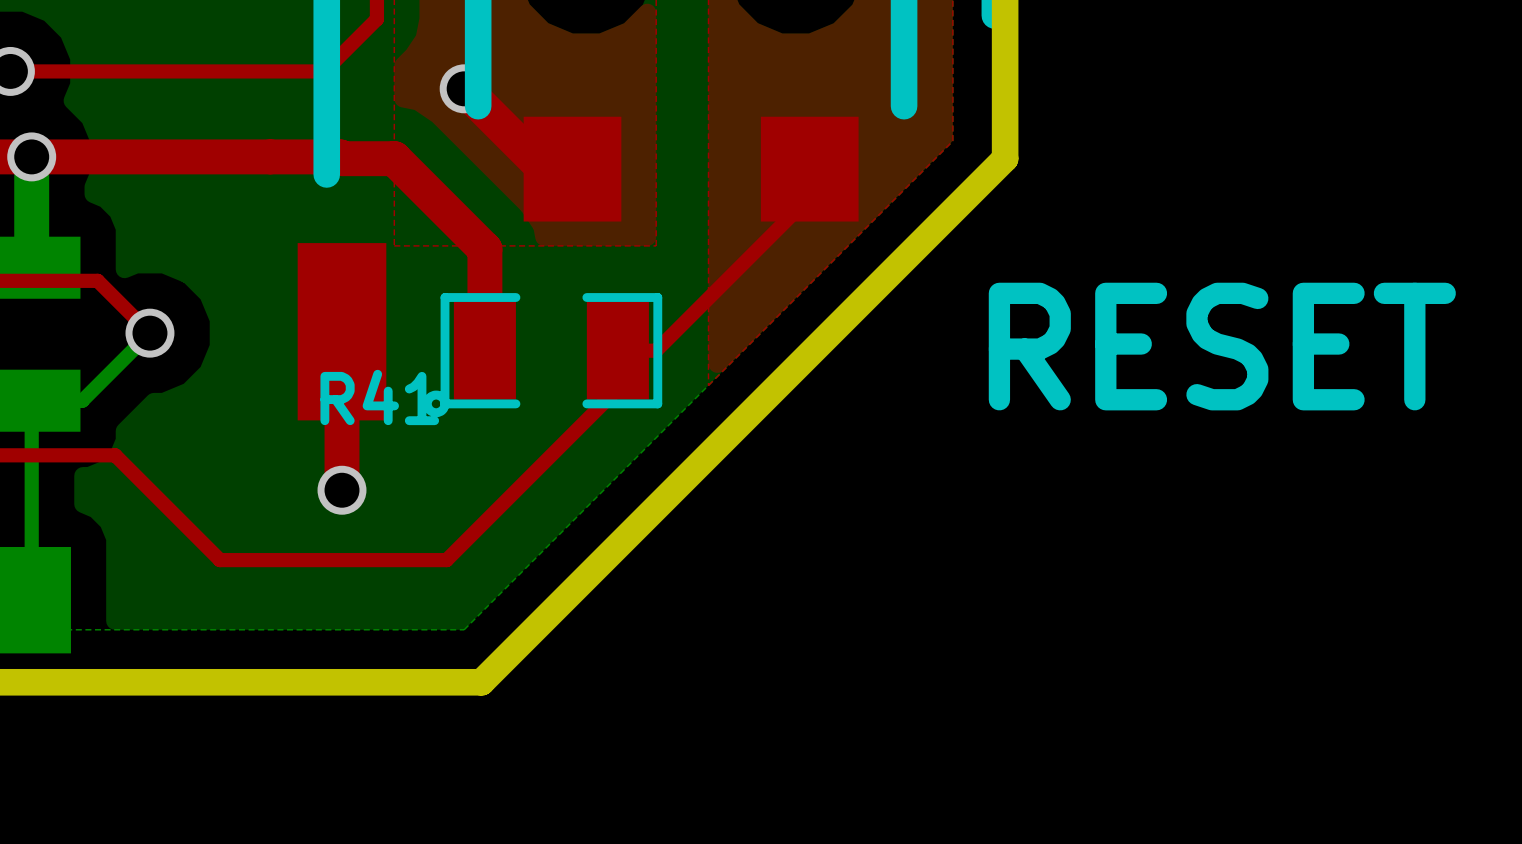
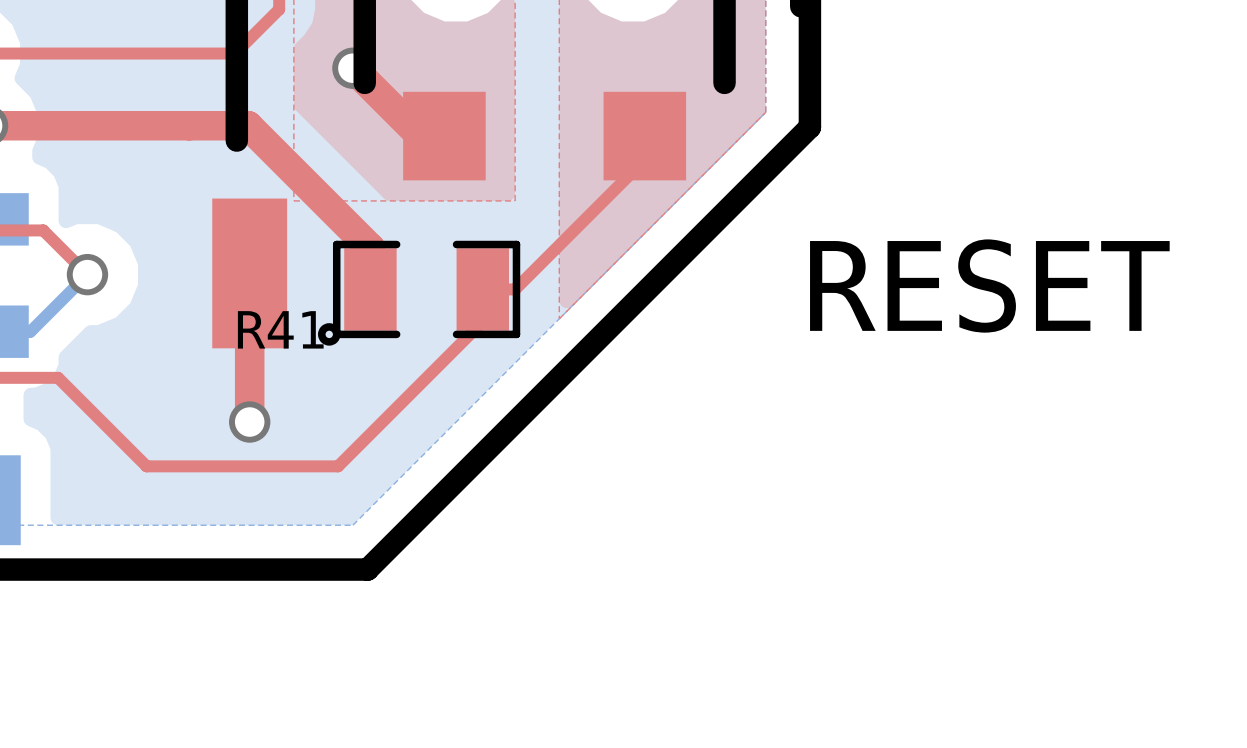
top track: (342, 158) (394, 158) (484, 249) (484, 301) -> (249, 127) (370, 247)
via position: (342, 490) -> (249, 422)

